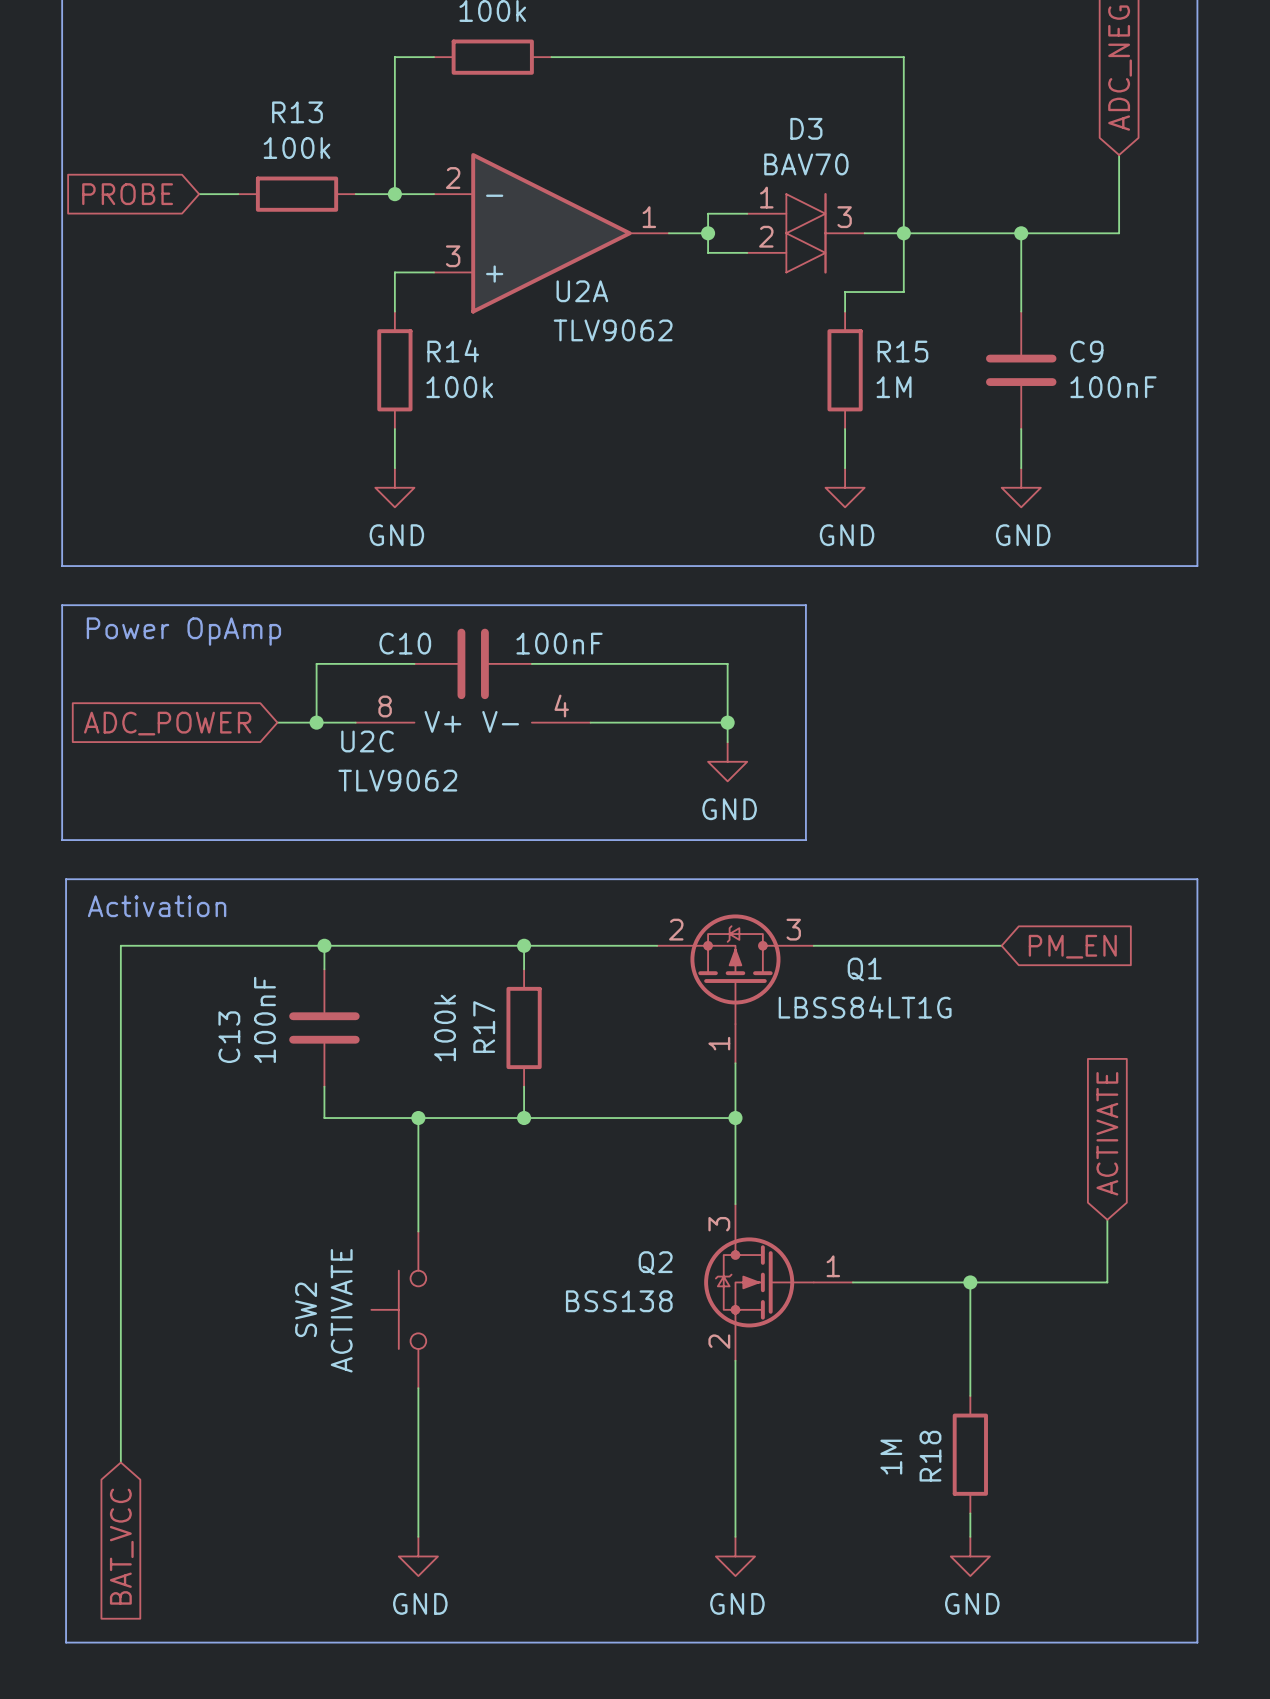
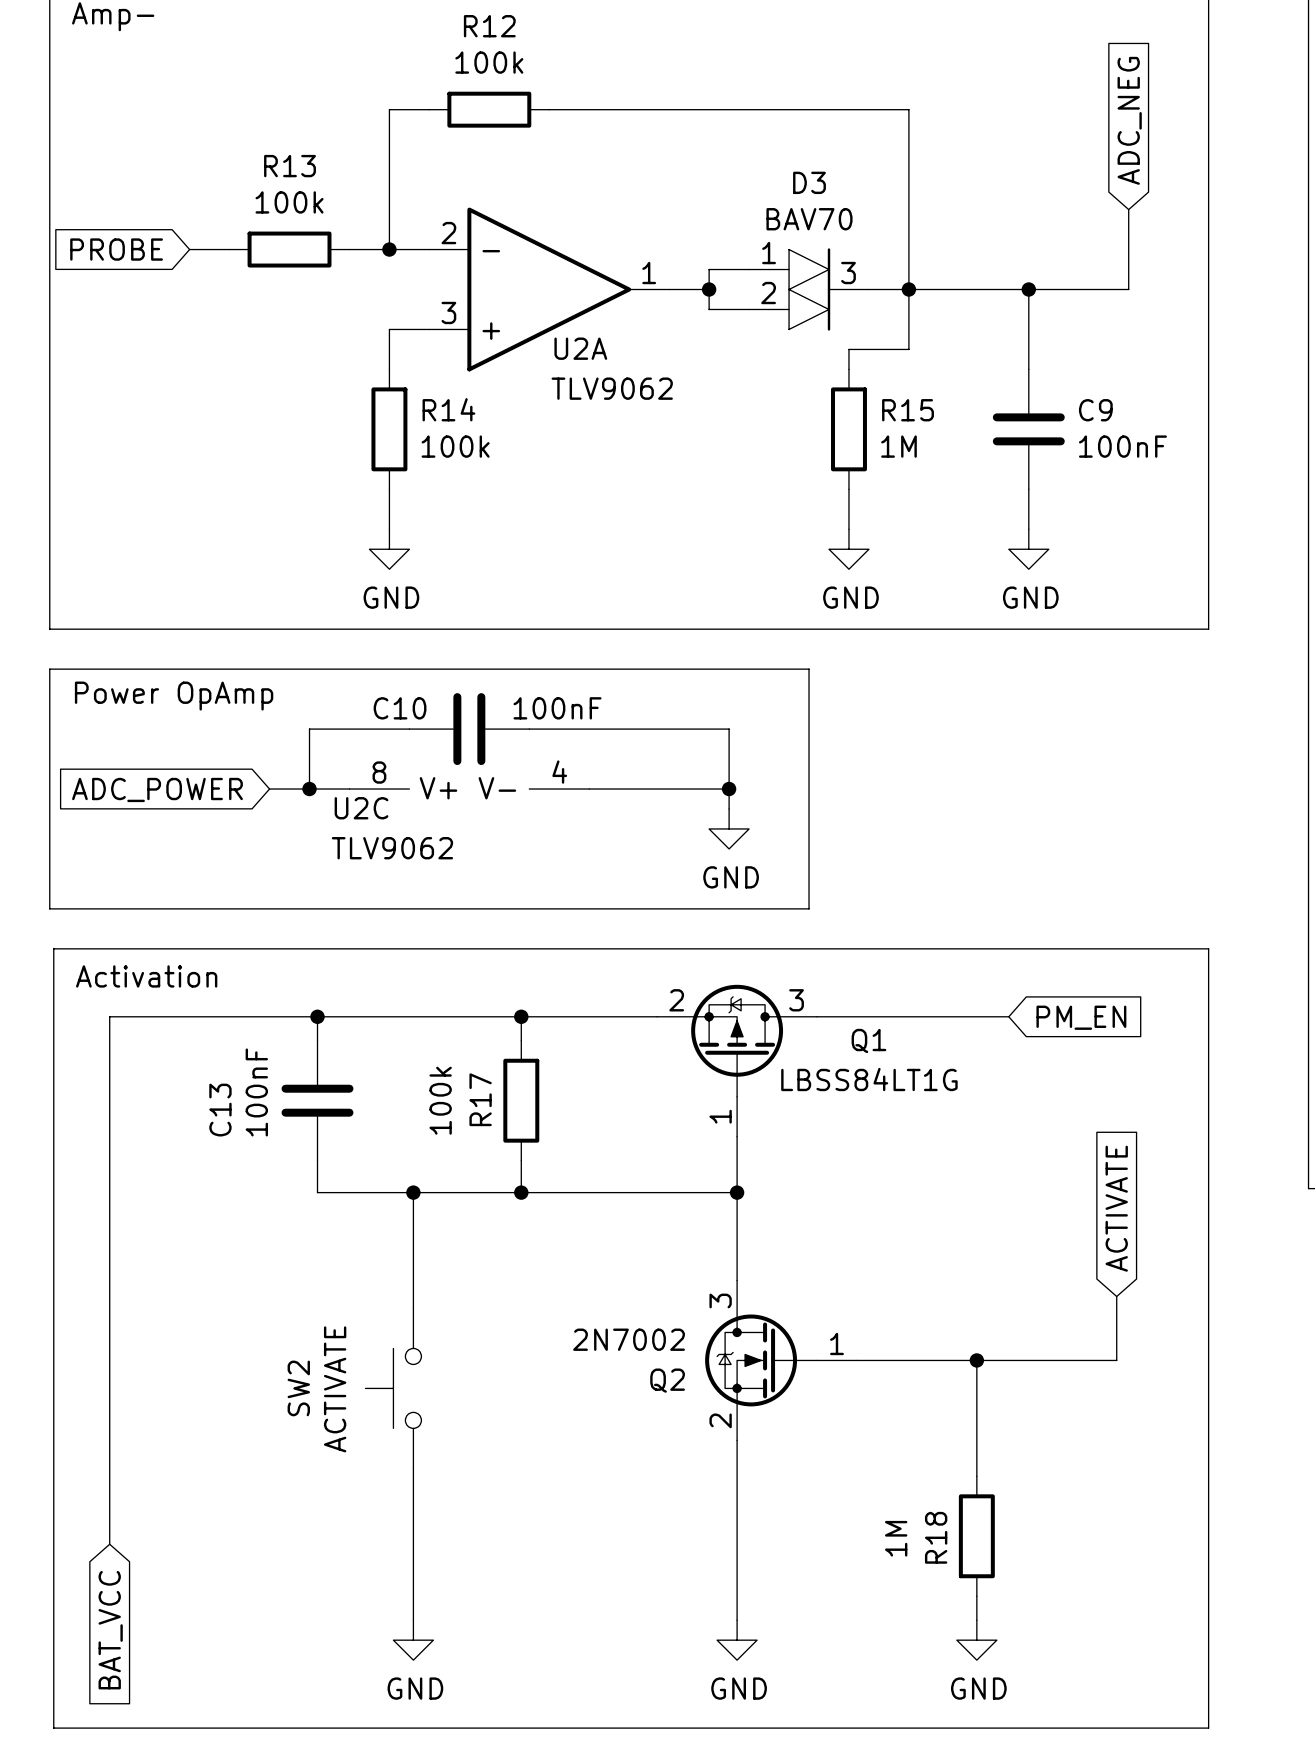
Q2 name position: Q2 (655, 1263) -> Q2 (667, 1380)
Q2 value: BSS138 (619, 1301) -> 2N7002 (629, 1339)

